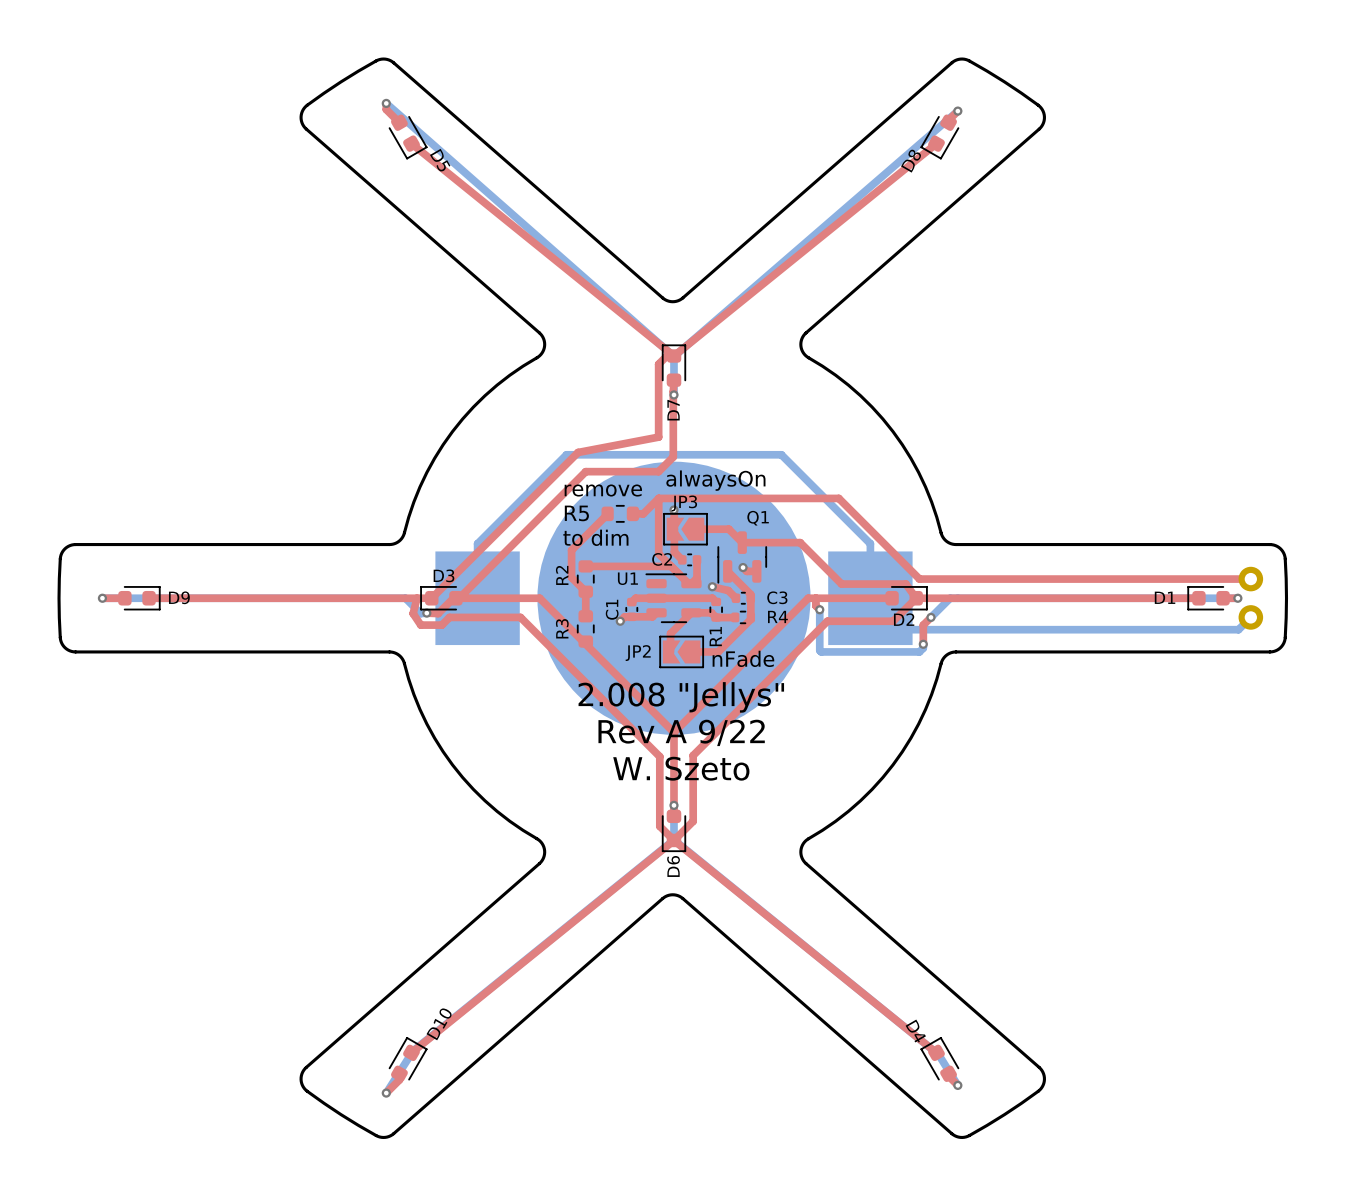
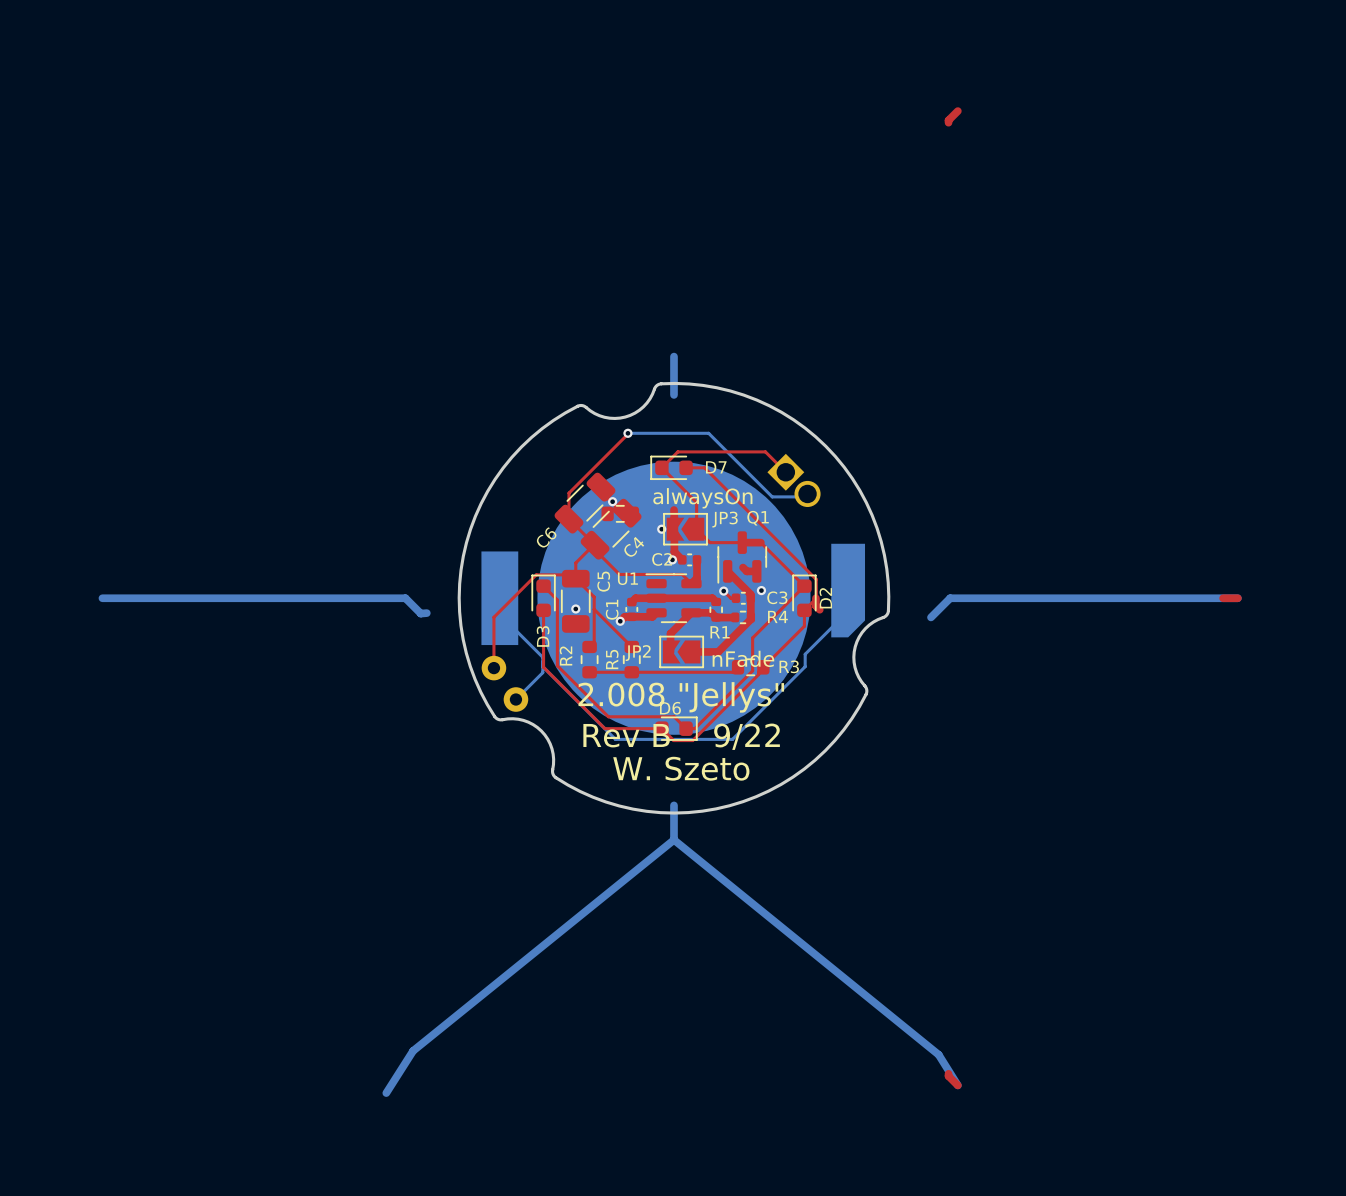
board edge: (376, 60) (385, 59) (393, 62) (662, 297) (670, 301) (682, 297) (954, 60) (962, 59) (969, 60) (1021, 93) (1042, 109) (1044, 118) (1040, 127) (806, 332) (801, 340) (802, 351) (807, 356) (835, 375) (860, 395) (892, 431) (918, 472) (931, 502) (941, 534) (947, 542) (955, 544) (1273, 545) (1281, 550) (1285, 558) (1285, 637) (1280, 647) (1269, 651) (949, 653) (942, 660) (931, 694) (918, 723) (892, 764) (860, 800) (803, 843) (800, 854) (806, 863) (1042, 1072) (1044, 1081) (1039, 1090) (969, 1135) (960, 1137) (951, 1133) (682, 898) (674, 894) (662, 898) (390, 1135) (383, 1137) (376, 1135) (323, 1103) (303, 1086) (301, 1077) (304, 1068) (539, 863) (544, 855) (543, 845) (538, 839) (509, 821) (484, 800) (452, 764) (426, 723) (413, 694) (403, 662) (397, 654) (389, 651) (71, 651) (63, 646) (60, 637) (60, 558) (65, 548) (75, 544) (396, 543) (403, 536) (413, 502) (426, 472) (452, 431) (484, 395) (542, 352) (544, 342) (539, 332) (302, 124) (301, 114) (305, 106) (376, 60) -> none
bottom track: (386, 103) (673, 356) (957, 111) -> none
top track: (386, 103) (386, 109) (399, 122) -> none
via: (386, 103) -> none
via: (957, 111) -> none
D5: (408, 136) -> none
D8: (939, 136) -> none
top track: (411, 143) (673, 356) -> none
top track: (936, 143) (673, 356) -> none
top track: (673, 356) (666, 356) (658, 364) (658, 437) (578, 452) (431, 598) (149, 598) -> none
D7 rotation: 0° (673, 365) -> 90° counterclockwise (671, 467)
D7 position: (673, 365) -> (671, 467)
top track: (673, 380) (673, 457) (658, 471) (585, 471) (459, 598) -> none
board edge: none -> (661, 383) (655, 386) (643, 406) (625, 417) (604, 417) (583, 406) (577, 406) (542, 428) (511, 457) (487, 491) (470, 529) (461, 570) (459, 611) (466, 653) (475, 679) (487, 704) (497, 718) (523, 720) (541, 730) (551, 748) (552, 772) (555, 777) (580, 791) (619, 806) (660, 812) (688, 812) (729, 805) (768, 791) (804, 769) (834, 740) (851, 718) (866, 693) (866, 688) (855, 667) (854, 651) (859, 637) (865, 628) (887, 613) (888, 582) (881, 541) (866, 502) (844, 467) (815, 436) (781, 412) (743, 395) (703, 385) (661, 383)
via: (673, 394) -> none
bottom track: none -> (627, 433) (708, 433) (772, 496) (810, 496)
via: none -> (627, 433)
part footprint: [435, 461, 913, 735] -> [481, 461, 866, 735]
top track: none -> (686, 467) (704, 467) (816, 579) (816, 598) (804, 610) (804, 626) (758, 671) (758, 674) (692, 740) (673, 740) (661, 728) (604, 728) (543, 667) (543, 610)
text position: alwaysOn (715, 480) -> alwaysOn (702, 498)
part: none -> (793, 480)
text: remove (603, 490) -> none
top track: (658, 498) (658, 553) (688, 583) (691, 583) -> (628, 434) (568, 493) (568, 519) (595, 545) (595, 550) (619, 574) (682, 574) (691, 583)
top track: (658, 498) (838, 498) (919, 579) (1250, 579) -> none
top track: (658, 498) (643, 513) (632, 513) -> none
via: none -> (612, 501)
C6: none -> (585, 503)
JP3 name position: JP3 (684, 503) -> JP3 (725, 519)
via position: (673, 510) -> (661, 529)
text: R5 (576, 513) -> none
top track: (608, 513) (571, 550) (571, 577) (585, 591) (585, 616) -> none
C4: none -> (611, 529)
top track: (696, 529) (728, 529) (742, 542) -> (782, 469) (765, 451) (677, 451) (661, 467) (696, 502) (696, 529) (710, 542) (742, 542)
text: to dim (595, 537) -> none
top track: (760, 542) (800, 542) (841, 584) (905, 584) (916, 598) -> (760, 542) (804, 586) (752, 637) (752, 670) (694, 728) (686, 728) (674, 716) (608, 716) (557, 665) (557, 599) (543, 586)
top track: none -> (592, 546) (575, 562) (575, 578)
via: none -> (672, 559)
top track: (585, 566) (671, 566) -> none
via: (743, 567) -> none
D3 name position: D3 (443, 575) -> D3 (543, 636)
R2 position: (585, 579) -> (589, 659)
top track: (712, 586) (728, 590) (735, 598) -> (723, 591) (730, 598) (735, 598)
via position: (712, 586) -> (723, 591)
via: none -> (761, 590)
top track: (102, 598) (124, 598) -> none
via: (102, 598) -> none
D9: (139, 598) -> none
top track: (416, 598) (413, 613) (420, 625) (441, 625) (449, 617) (520, 617) (659, 756) (659, 826) (673, 840) -> none
D3 rotation: 0° (441, 598) -> 90° clockwise (543, 595)
D3 position: (441, 598) -> (543, 595)
bottom track: (477, 598) (477, 543) (566, 454) (781, 454) (870, 543) (870, 598) (901, 629) (1238, 629) (1250, 617) -> none
bottom track: none -> (499, 598) (499, 614) (542, 657) (542, 672) (515, 699)
bottom track: none -> (848, 598) (848, 611) (805, 654) (805, 666) (732, 739) (615, 739) (542, 666)
top track: (892, 598) (808, 598) (673, 732) -> none
D2 rotation: 0° (906, 598) -> 90° counterclockwise (804, 595)
D2 position: (906, 598) -> (804, 595)
top track: (916, 598) (1198, 598) -> none
top track: (916, 598) (893, 621) (827, 621) (693, 755) (693, 821) (673, 840) -> none
D1: (1208, 598) -> none
via: (1237, 598) -> none
part: (1250, 598) -> none
C5: none -> (575, 601)
via: none -> (575, 608)
top track: none -> (594, 609) (631, 646)
bottom track: (819, 609) (821, 651) (919, 651) (923, 648) (923, 644) -> none
via: (819, 609) -> none
top track: (426, 613) (438, 613) (453, 598) (539, 598) (673, 732) -> none
via: (426, 613) -> none
top track: (931, 617) (923, 625) (923, 644) -> none
via: (931, 617) -> none
R3 name position: R3 (562, 628) -> R3 (789, 666)
R3 rotation: 0° (585, 628) -> 90° clockwise (750, 667)
R3 position: (585, 628) -> (750, 667)
R1 name rotation: 0° (715, 636) -> 90° clockwise (720, 632)
via: (923, 644) -> none
top track: none -> (589, 646) (594, 642) (594, 597) (571, 574) (536, 574) (493, 617) (493, 668)
R5: none -> (631, 659)
top track: none -> (738, 667) (733, 672) (589, 672)
part: none -> (504, 683)
top track: (673, 732) (673, 816) -> none
text: Rev A 9/22 (681, 732) -> Rev B 9/22 (681, 736)
via: (673, 805) -> none
D6 rotation: 0° (673, 830) -> 90° counterclockwise (676, 728)
D6 position: (673, 830) -> (676, 728)
top track: (673, 840) (936, 1052) -> none
top track: (673, 840) (411, 1052) -> none
D6 name position: D6 (673, 866) -> D6 (670, 708)
D10: (408, 1059) -> none
D4: (939, 1059) -> none
top track: (399, 1073) (399, 1079) (386, 1093) -> none
via: (957, 1085) -> none
via: (386, 1093) -> none

